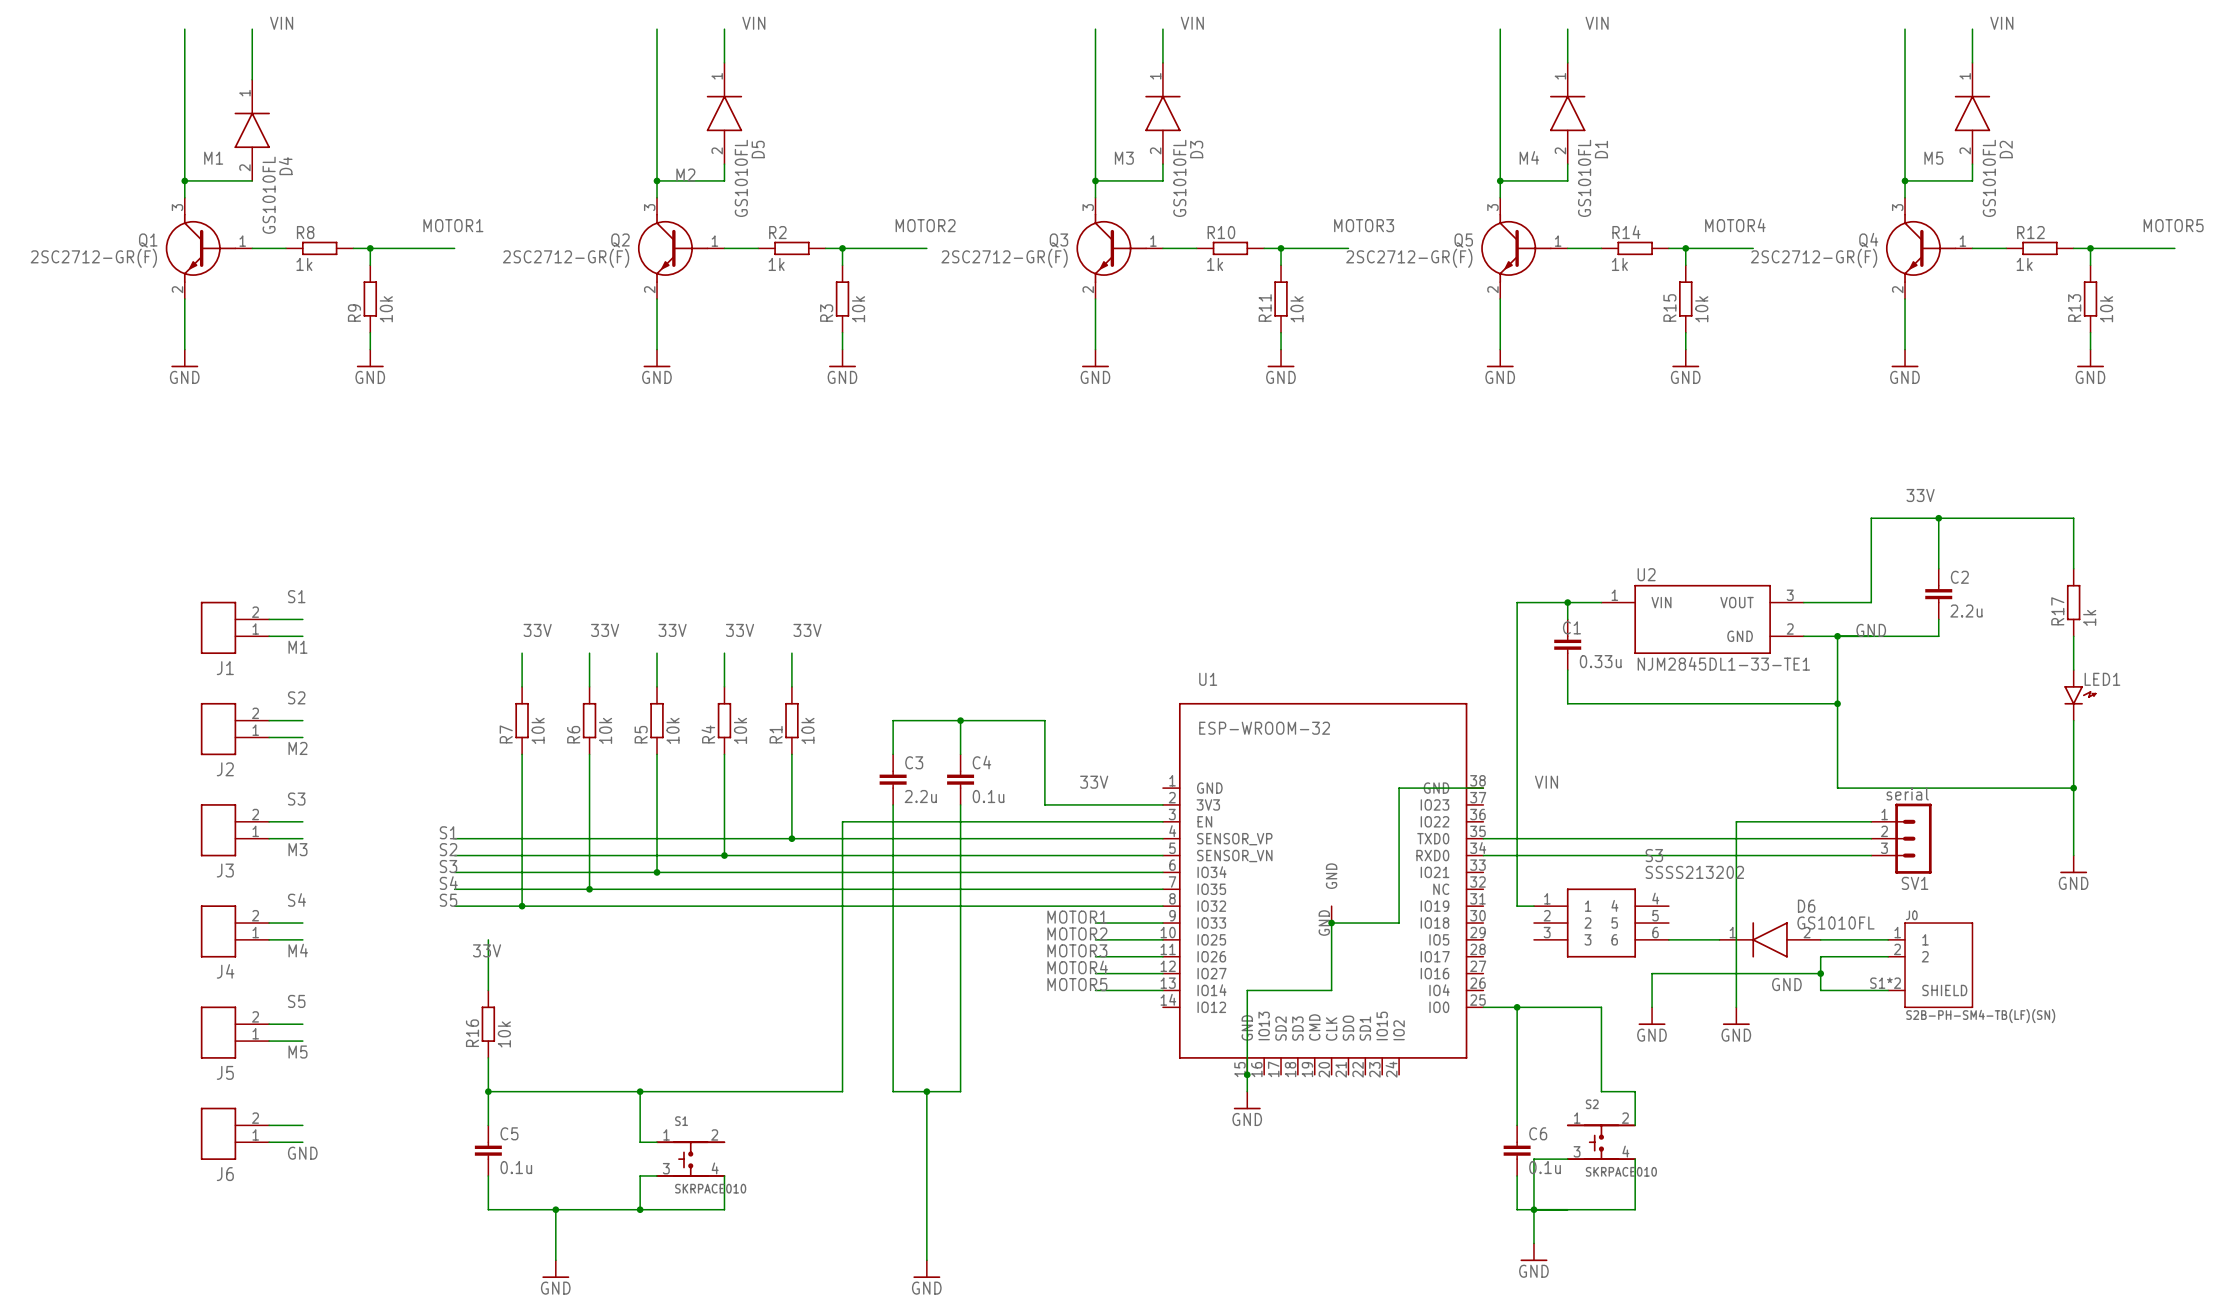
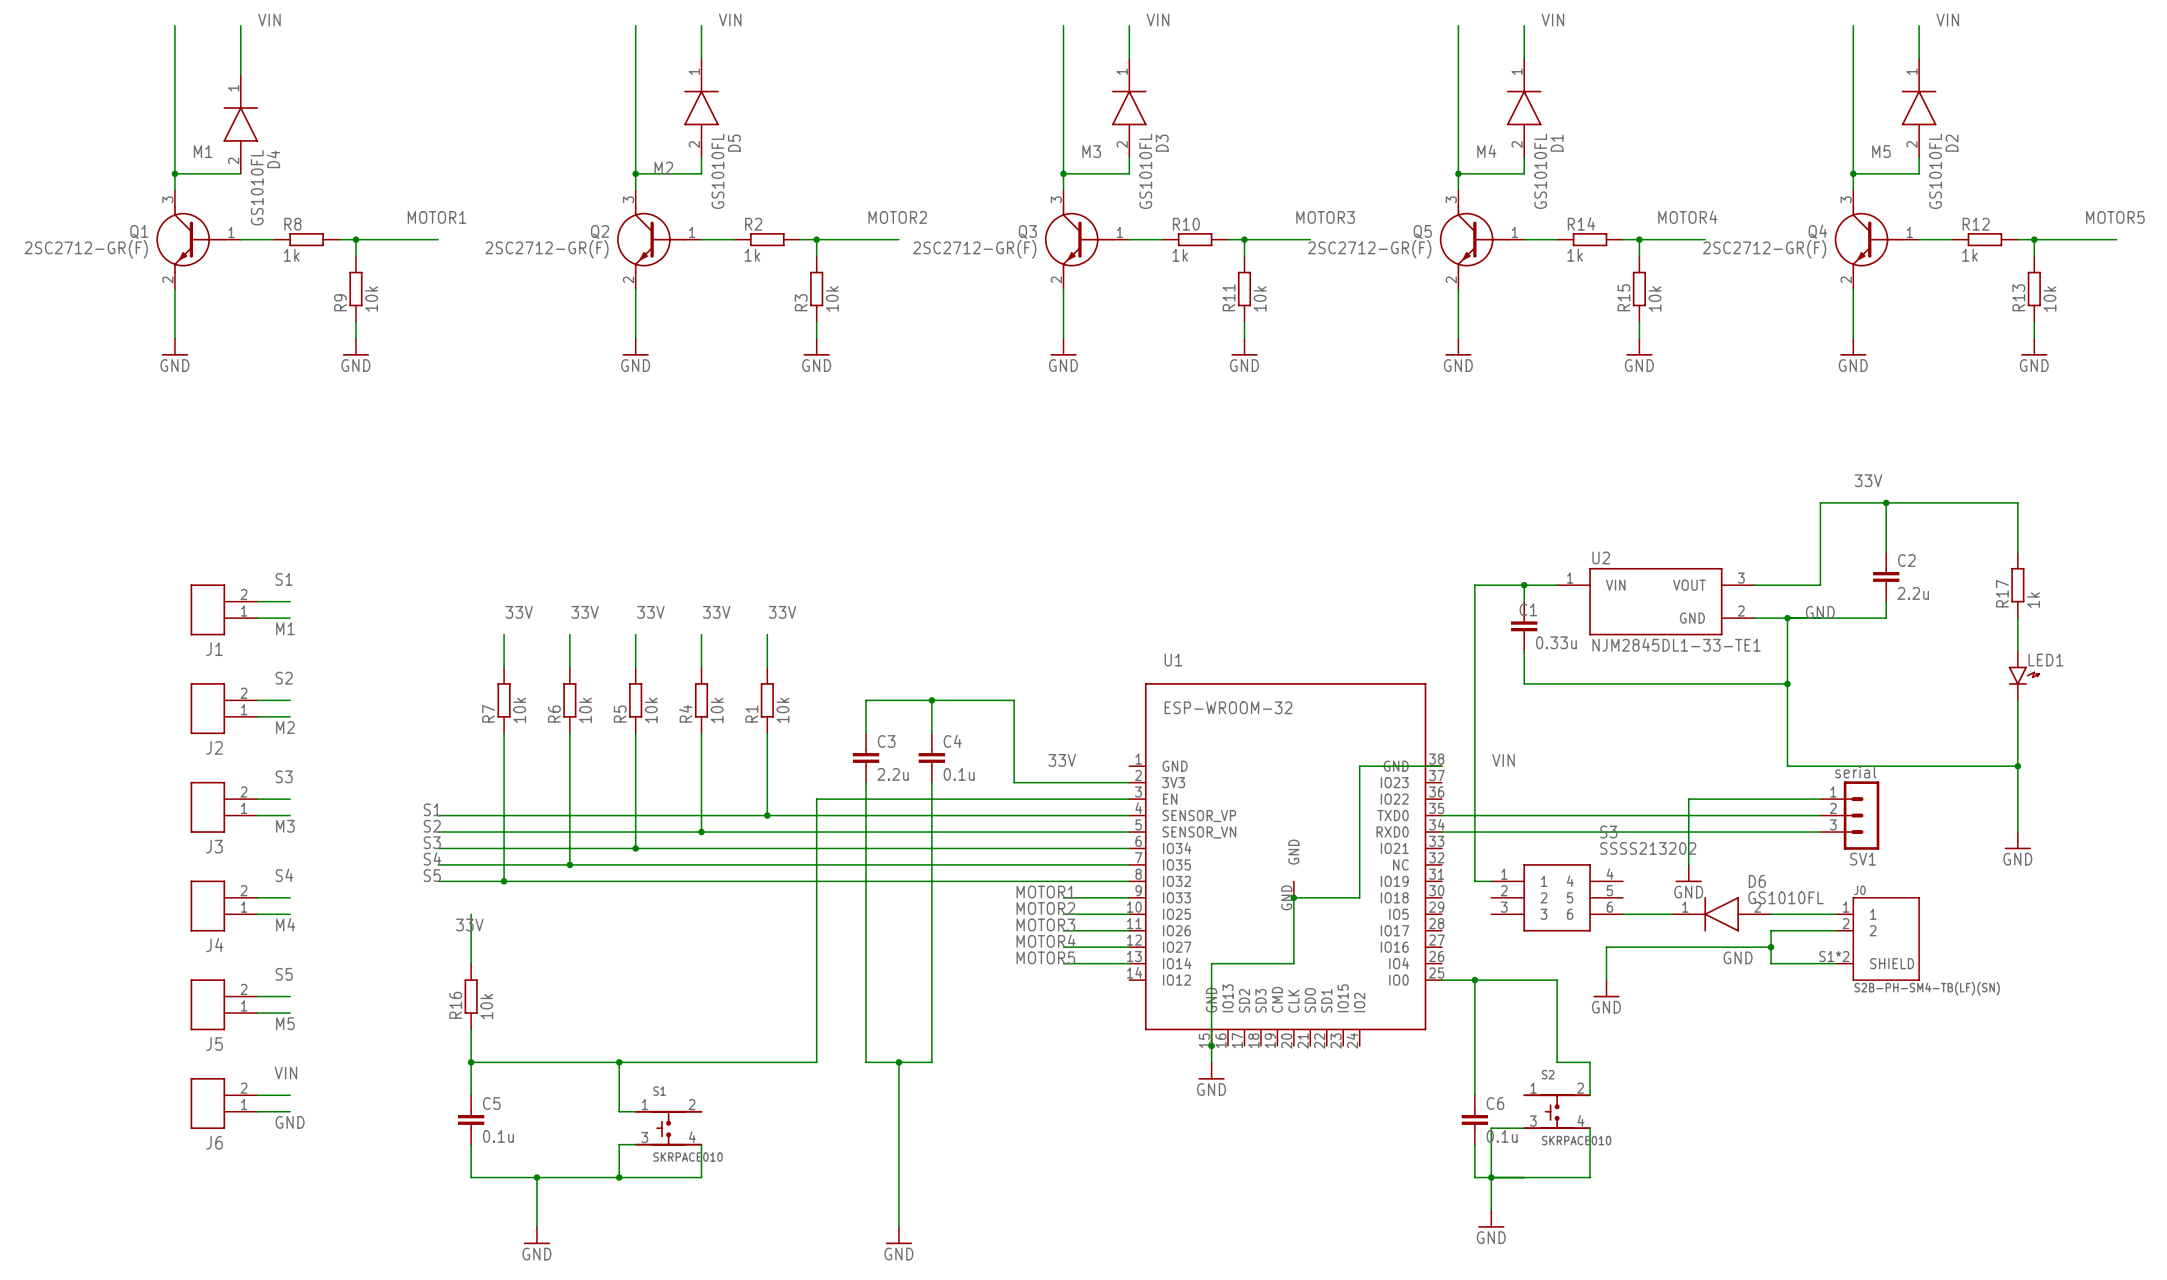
wire: (1736, 889) (1736, 1007) -> none
power symbol position: GND (1736, 1016) -> GND (1688, 873)
label: none -> VIN (285, 1073)

